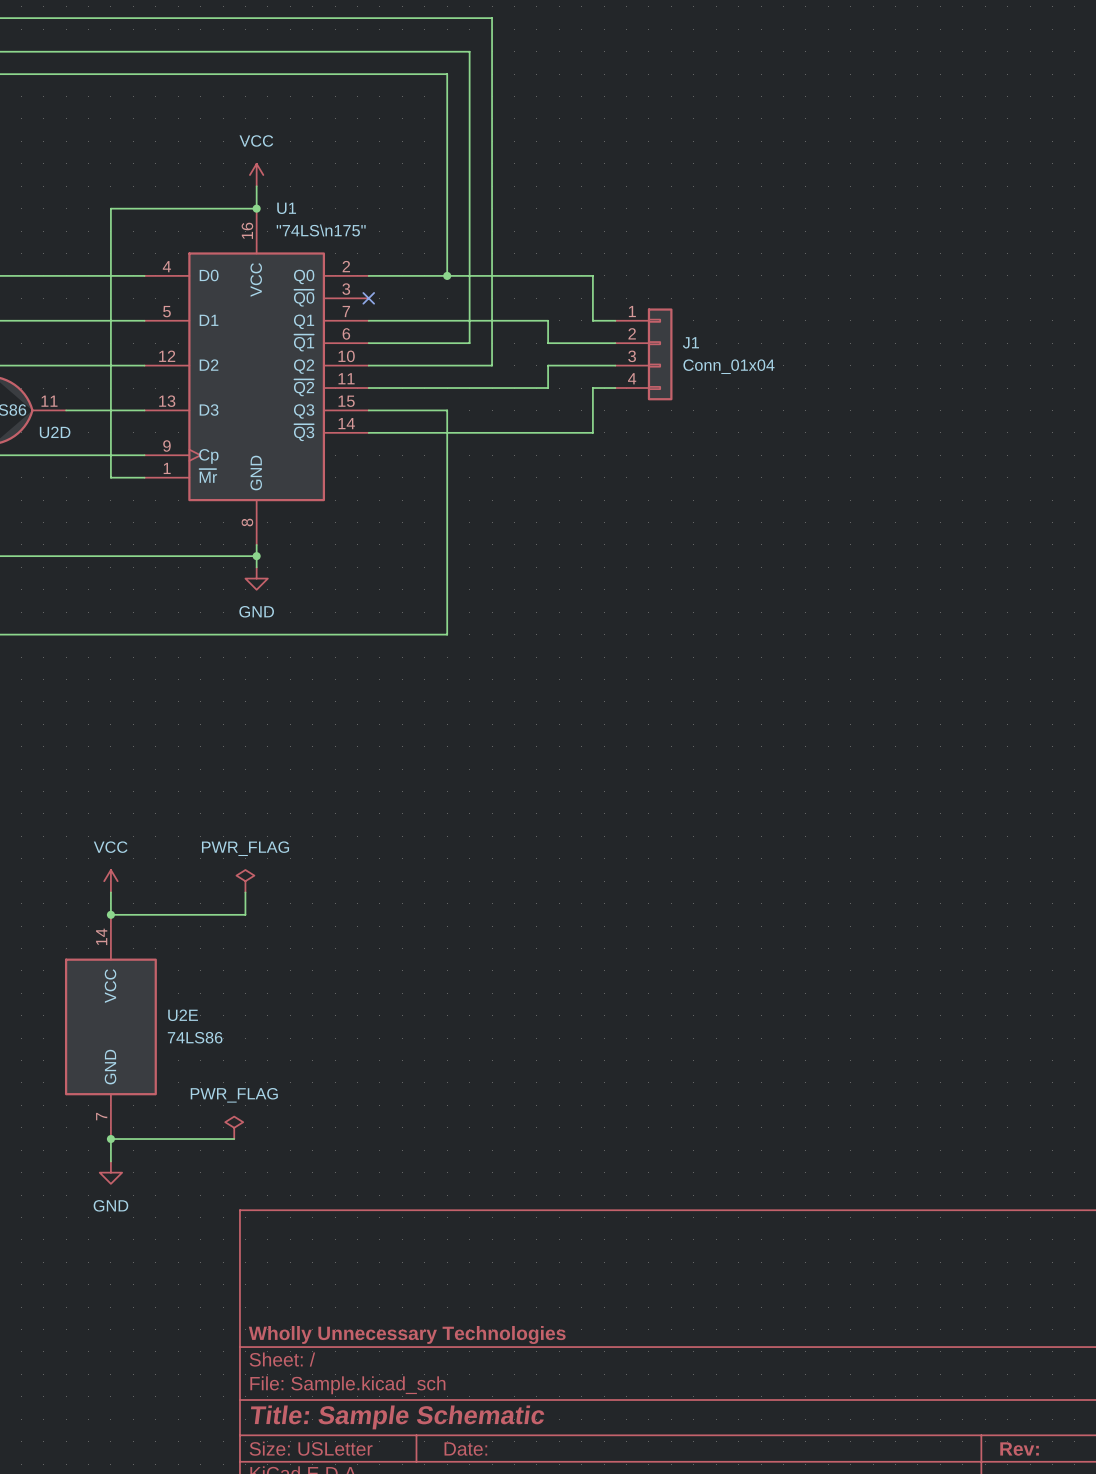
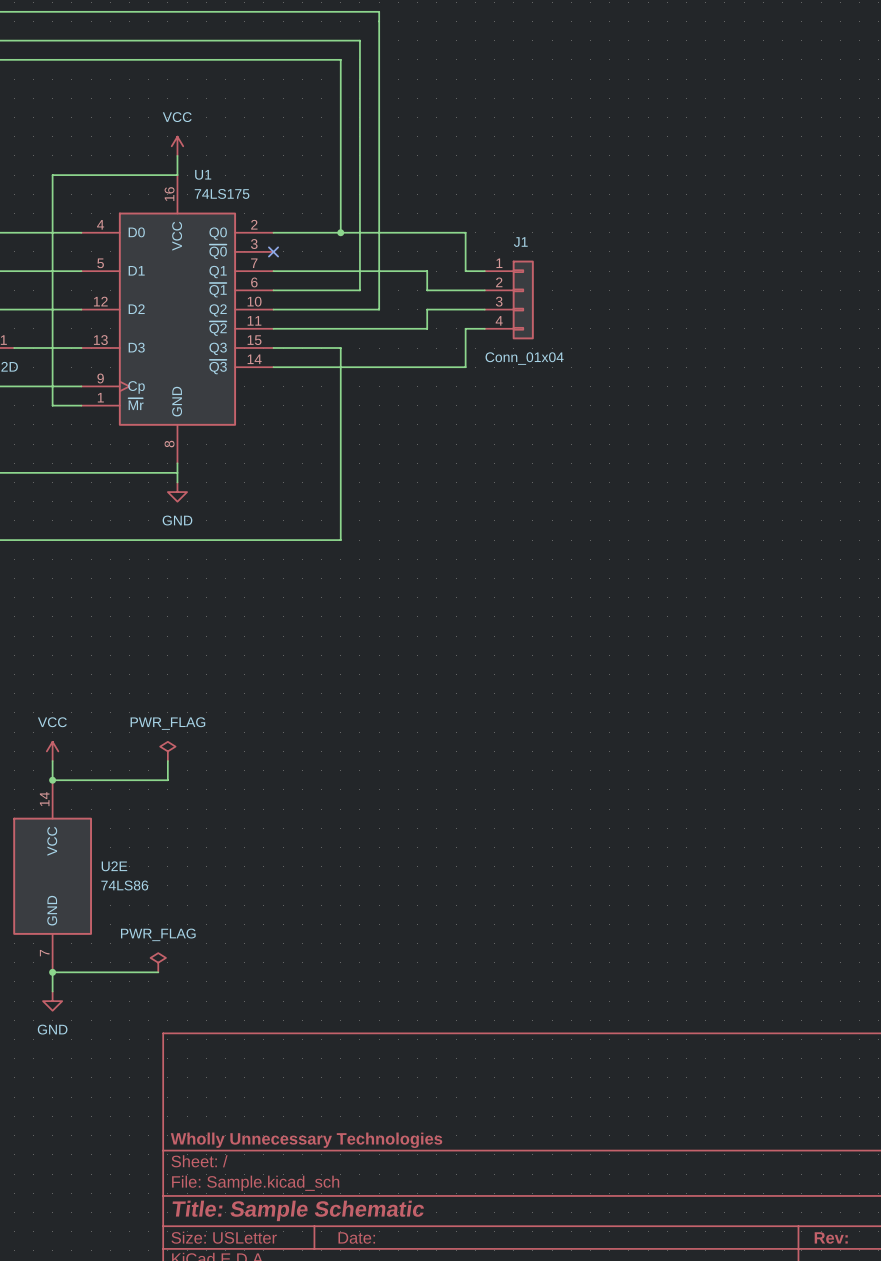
junction: (256, 208) -> none
U1 value: "74LS\n175" (321, 230) -> 74LS175 (222, 193)
J1 name position: J1 (690, 342) -> J1 (520, 242)
J1 value position: Conn_01x04 (728, 366) -> Conn_01x04 (524, 358)
junction: (256, 556) -> none

